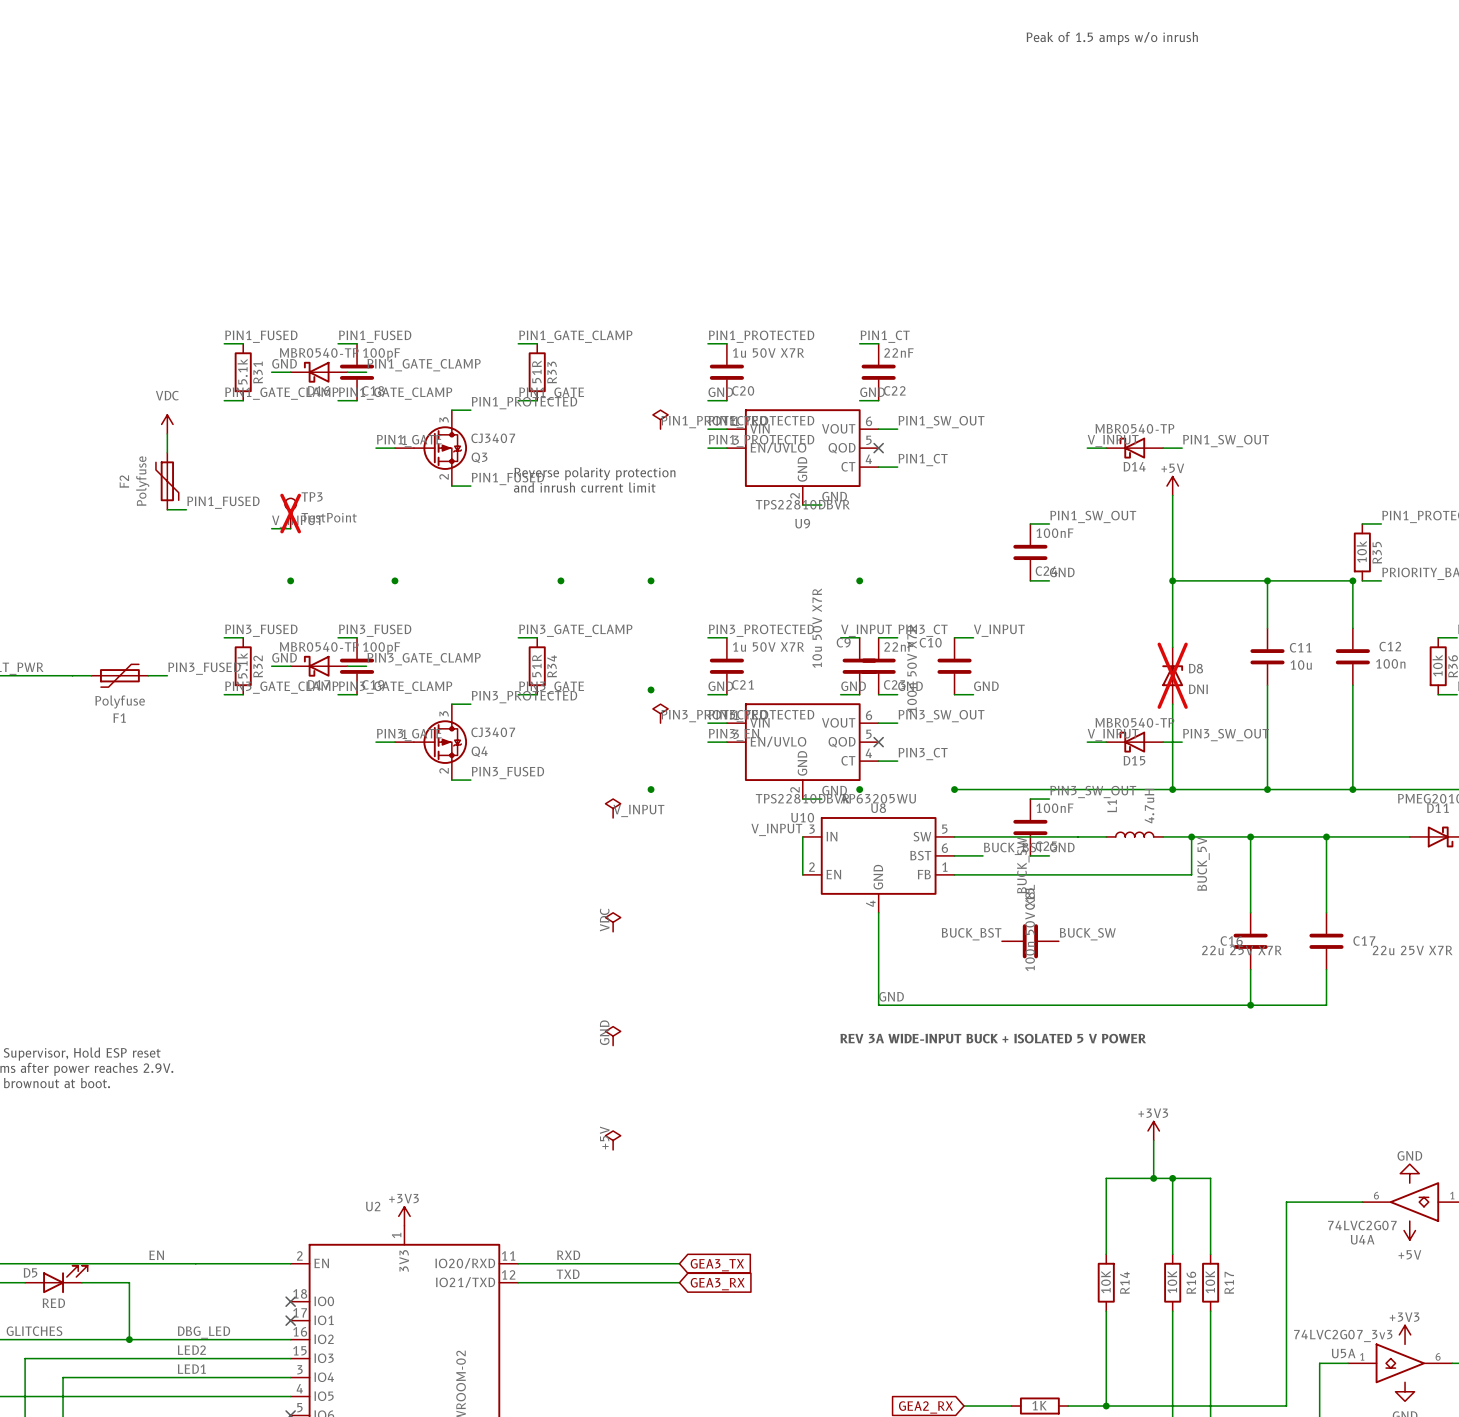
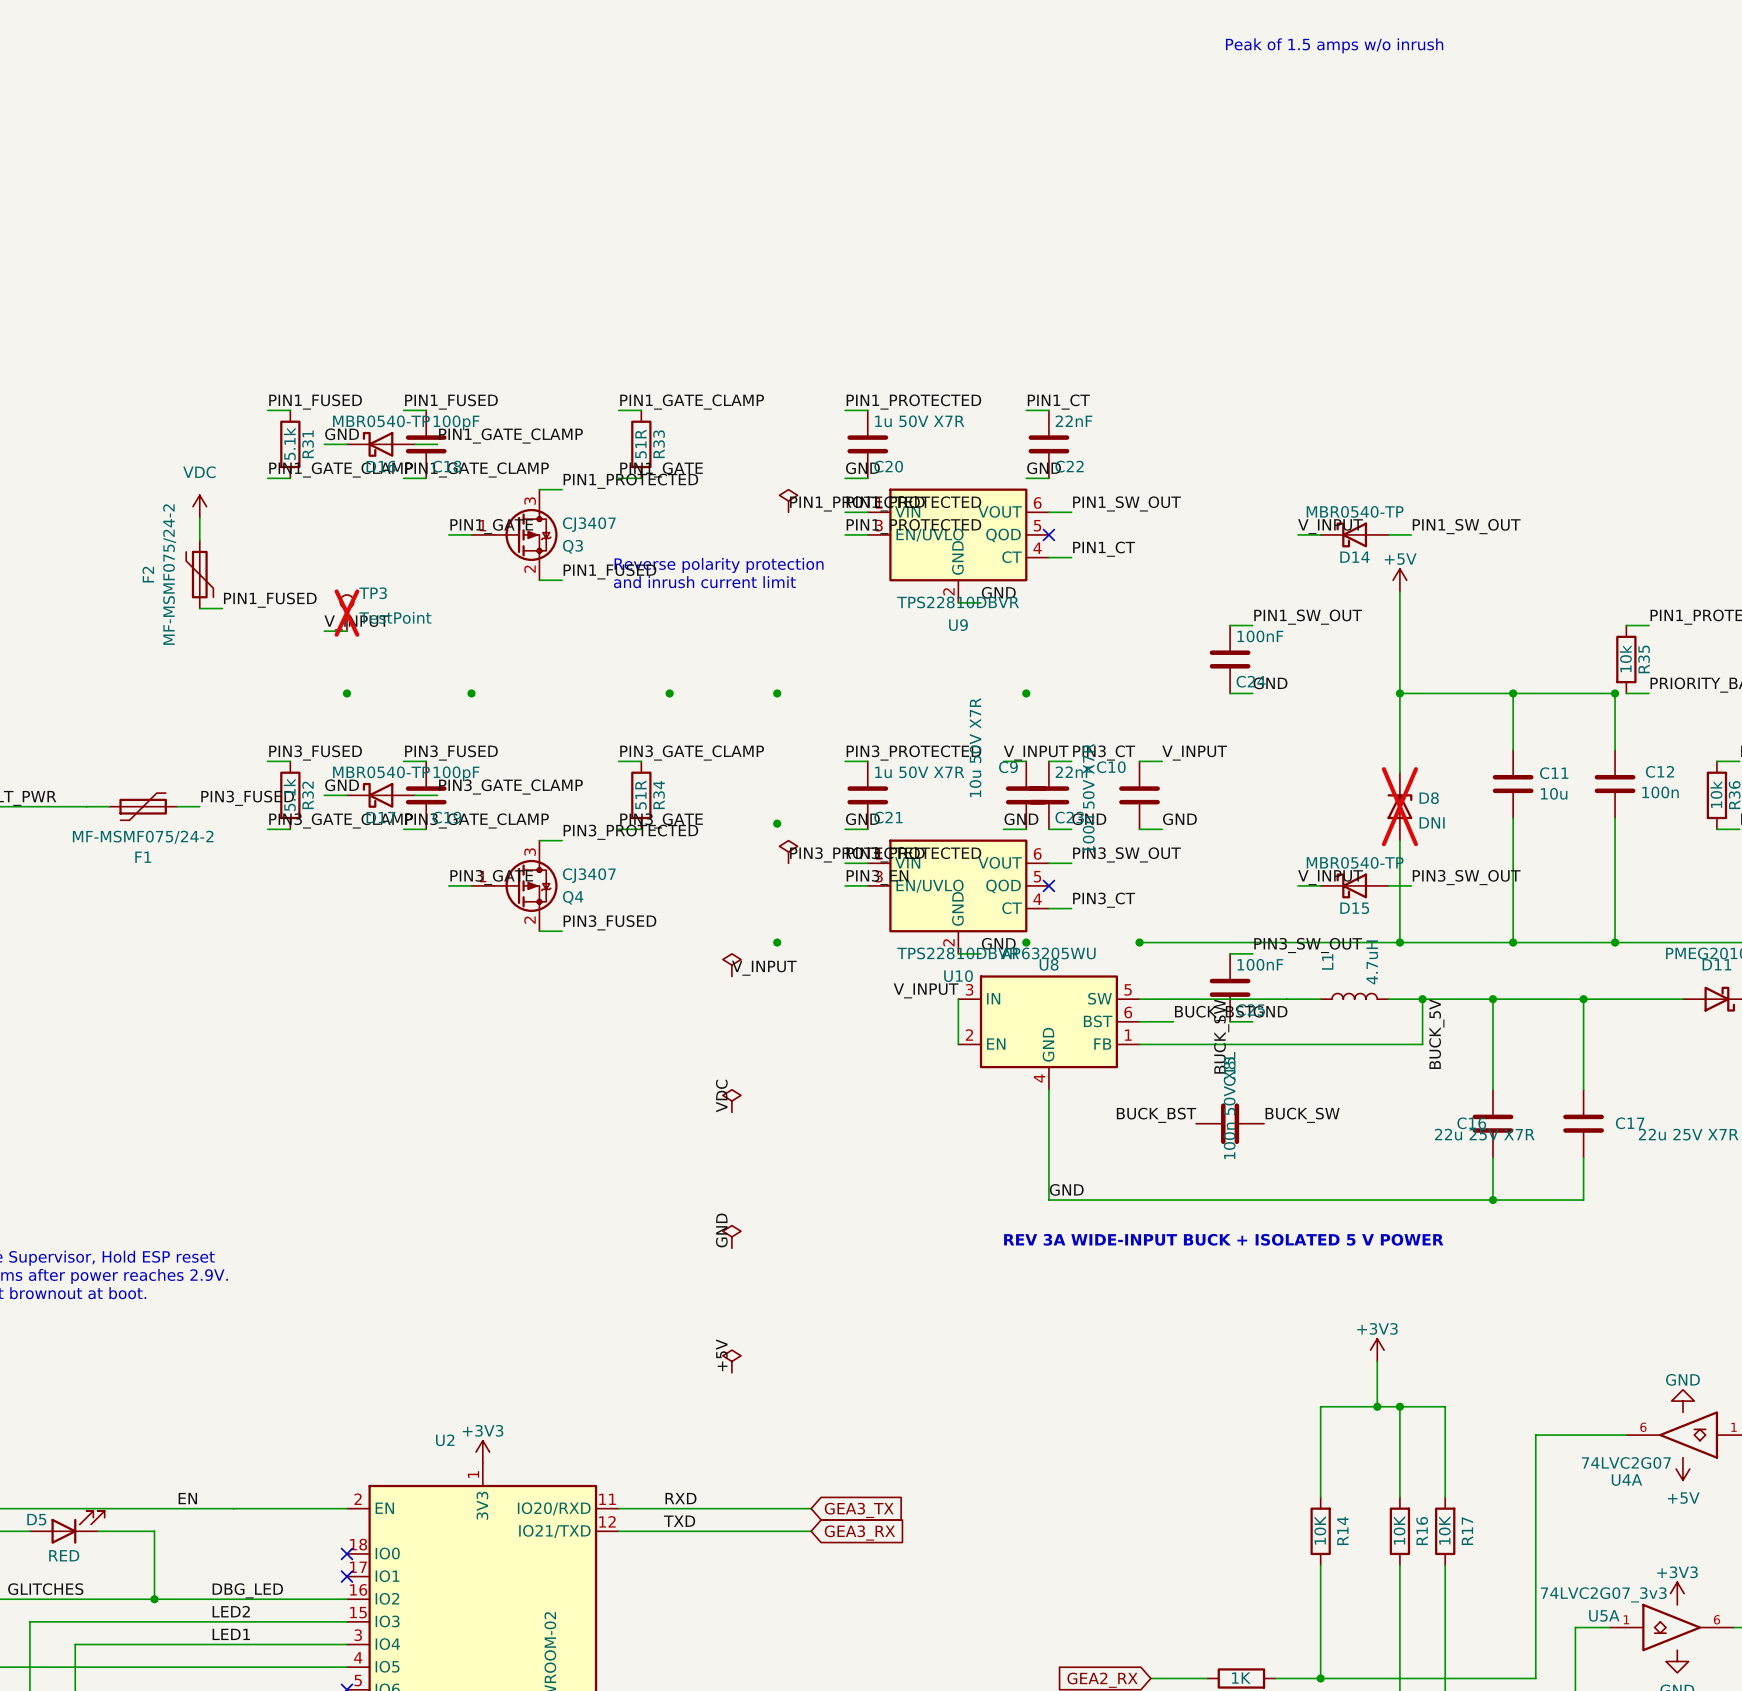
F2 value: Polyfuse (142, 481) -> MF-MSMF075/24-2 (169, 574)
F1 value: Polyfuse (120, 701) -> MF-MSMF075/24-2 (143, 837)

